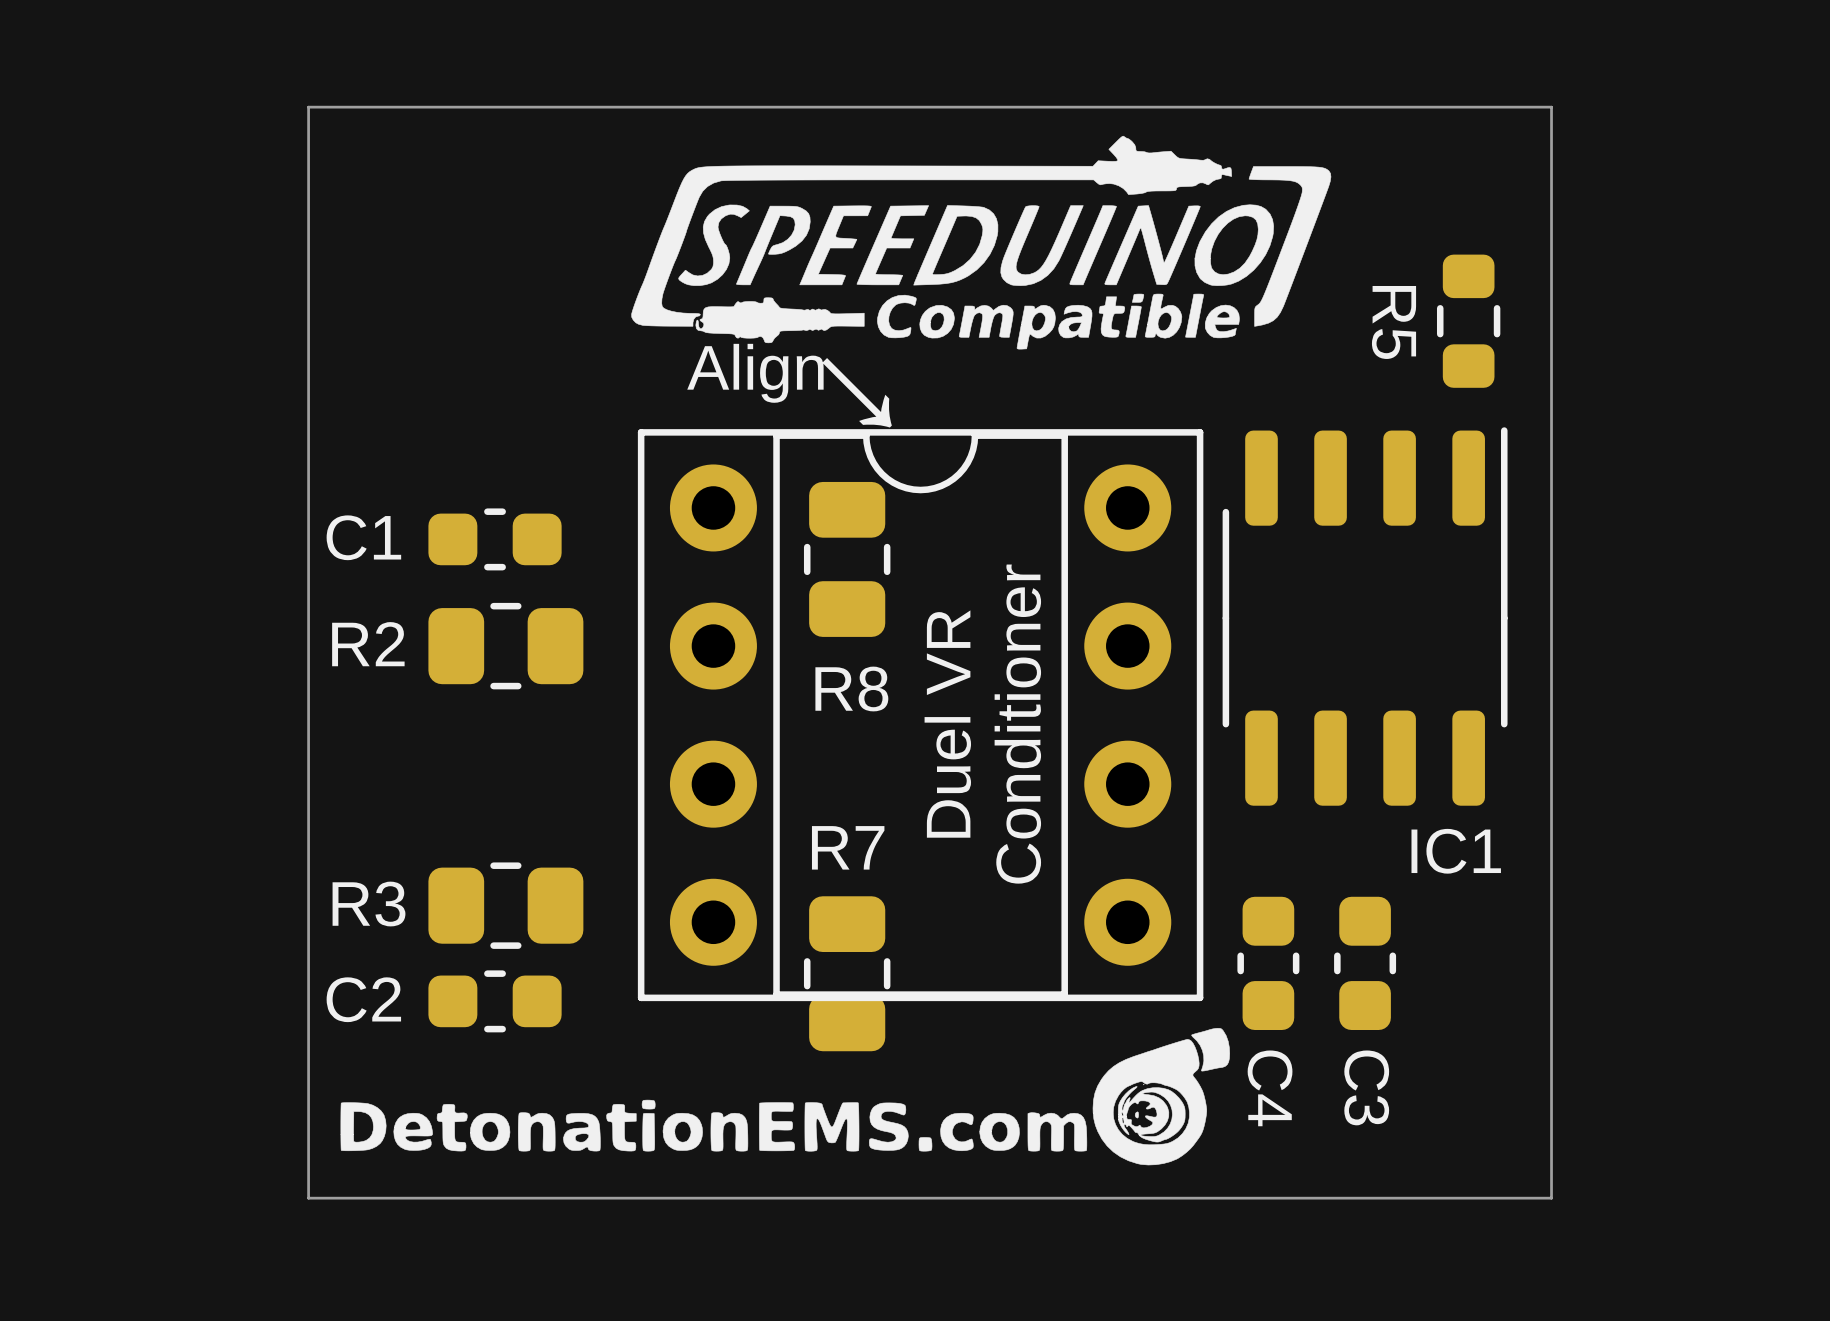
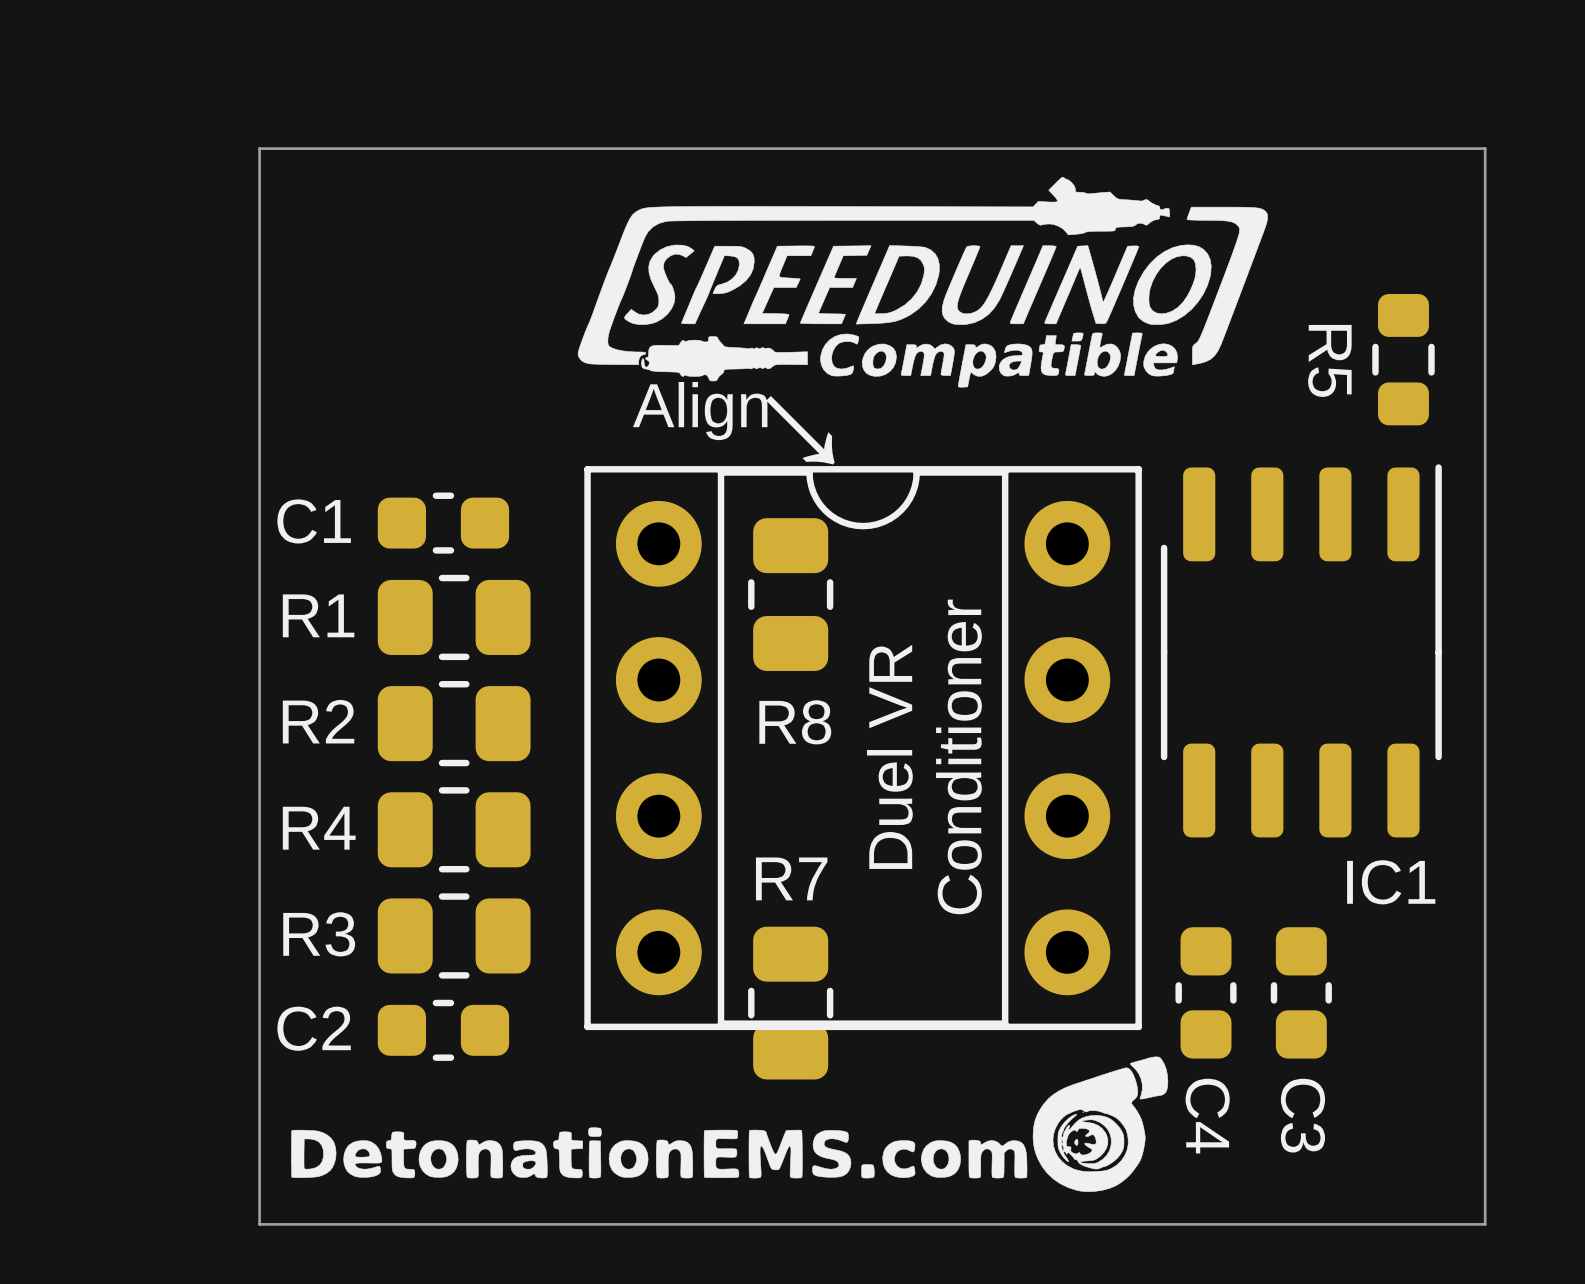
C1 position: (495, 539) -> (443, 523)
R1: none -> (454, 617)
R2 position: (505, 646) -> (454, 723)
R4: none -> (454, 829)

